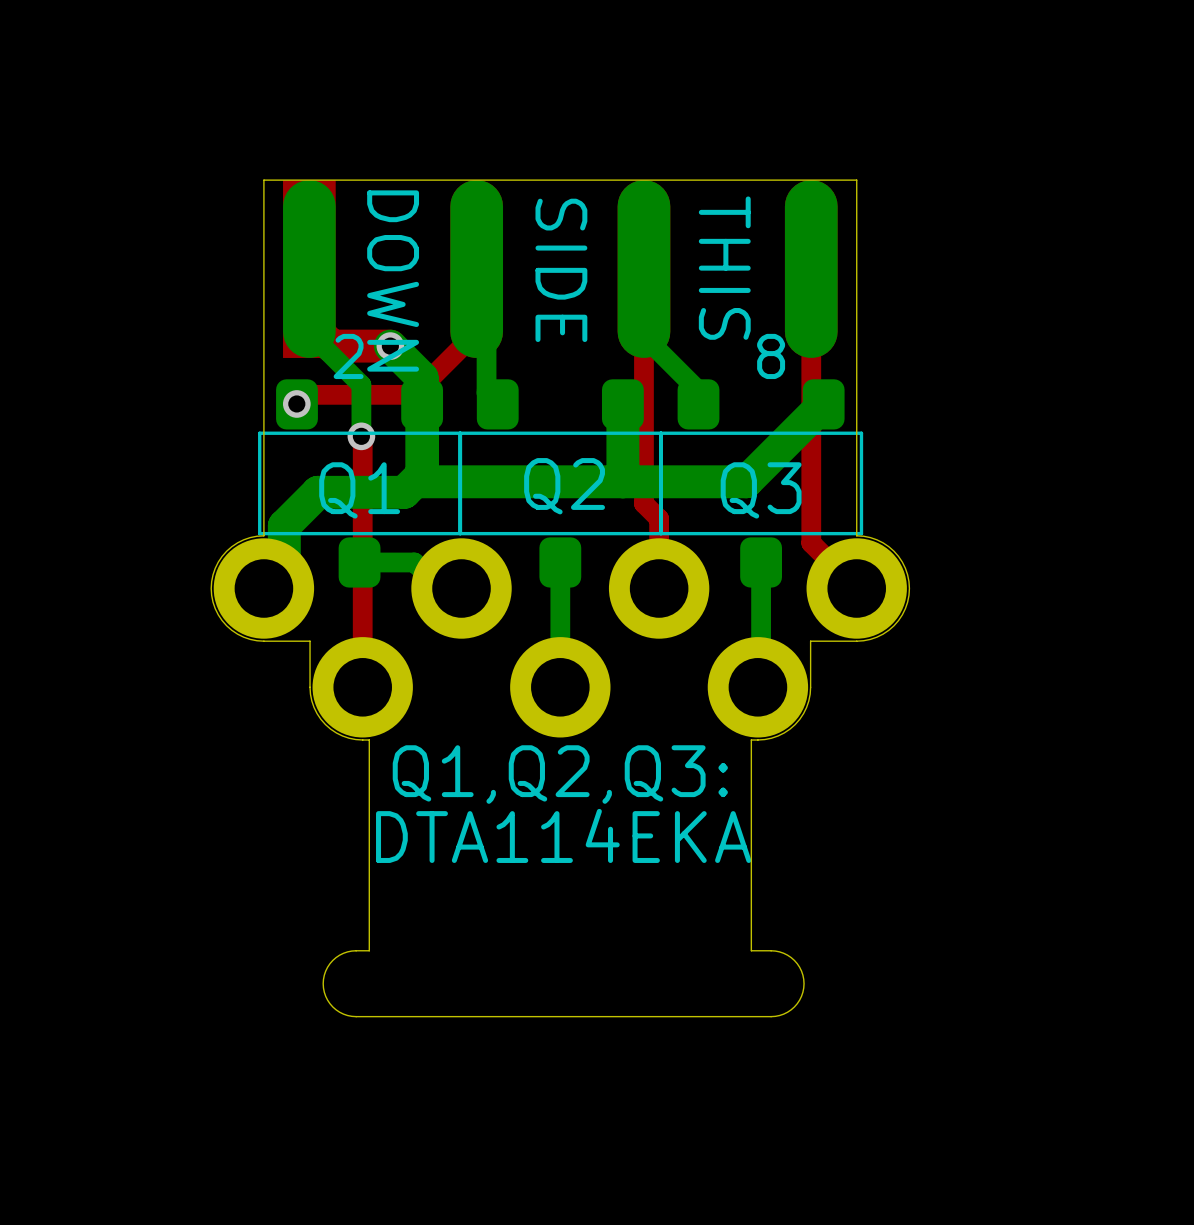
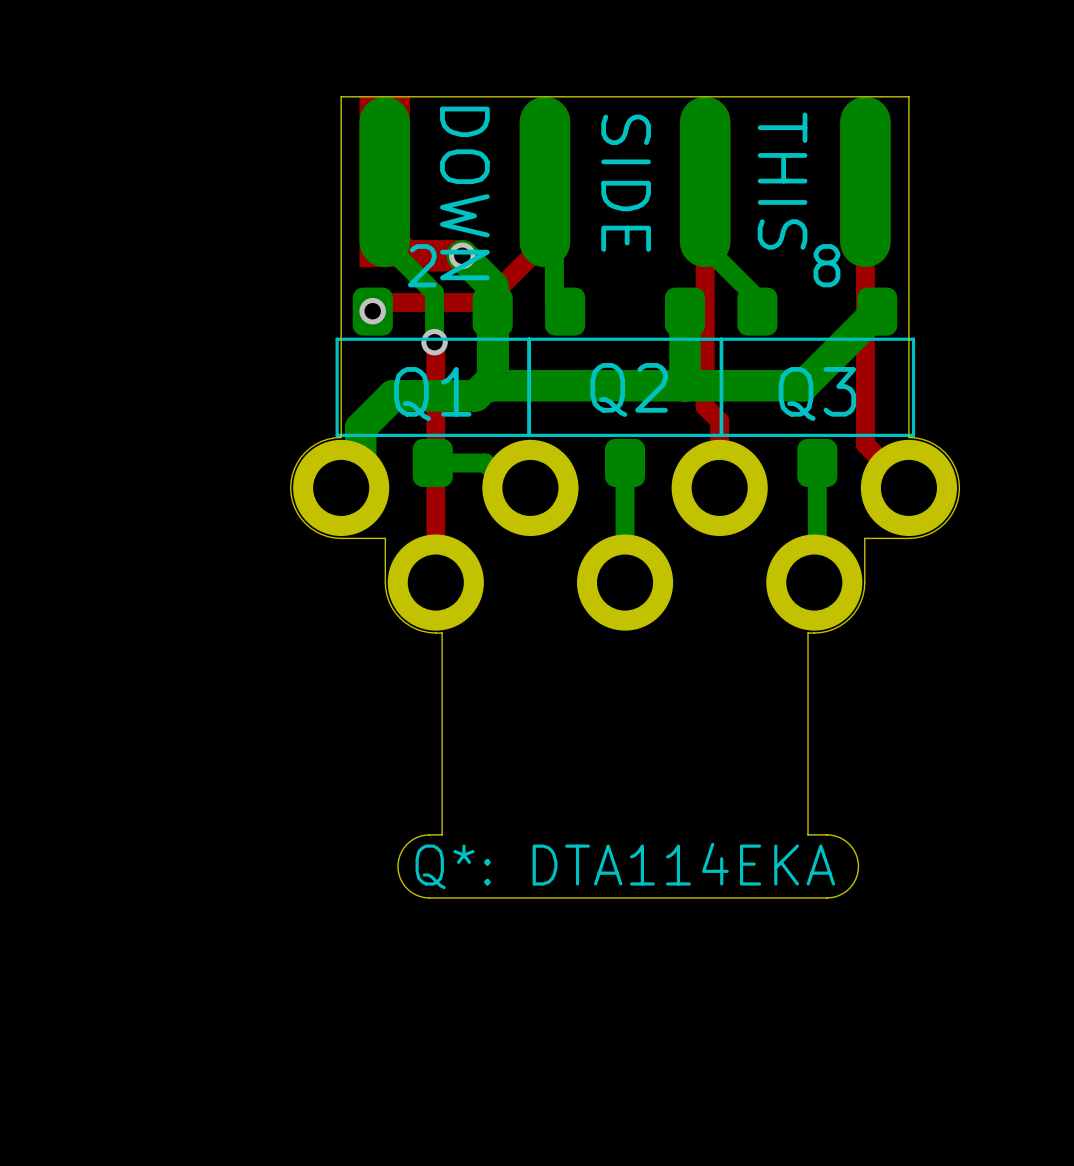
text: Q1,Q2,Q3: (560, 774) -> none
text: DTA114EKA (563, 835) -> none
text: none -> Q*: DTA114EKA (625, 865)

